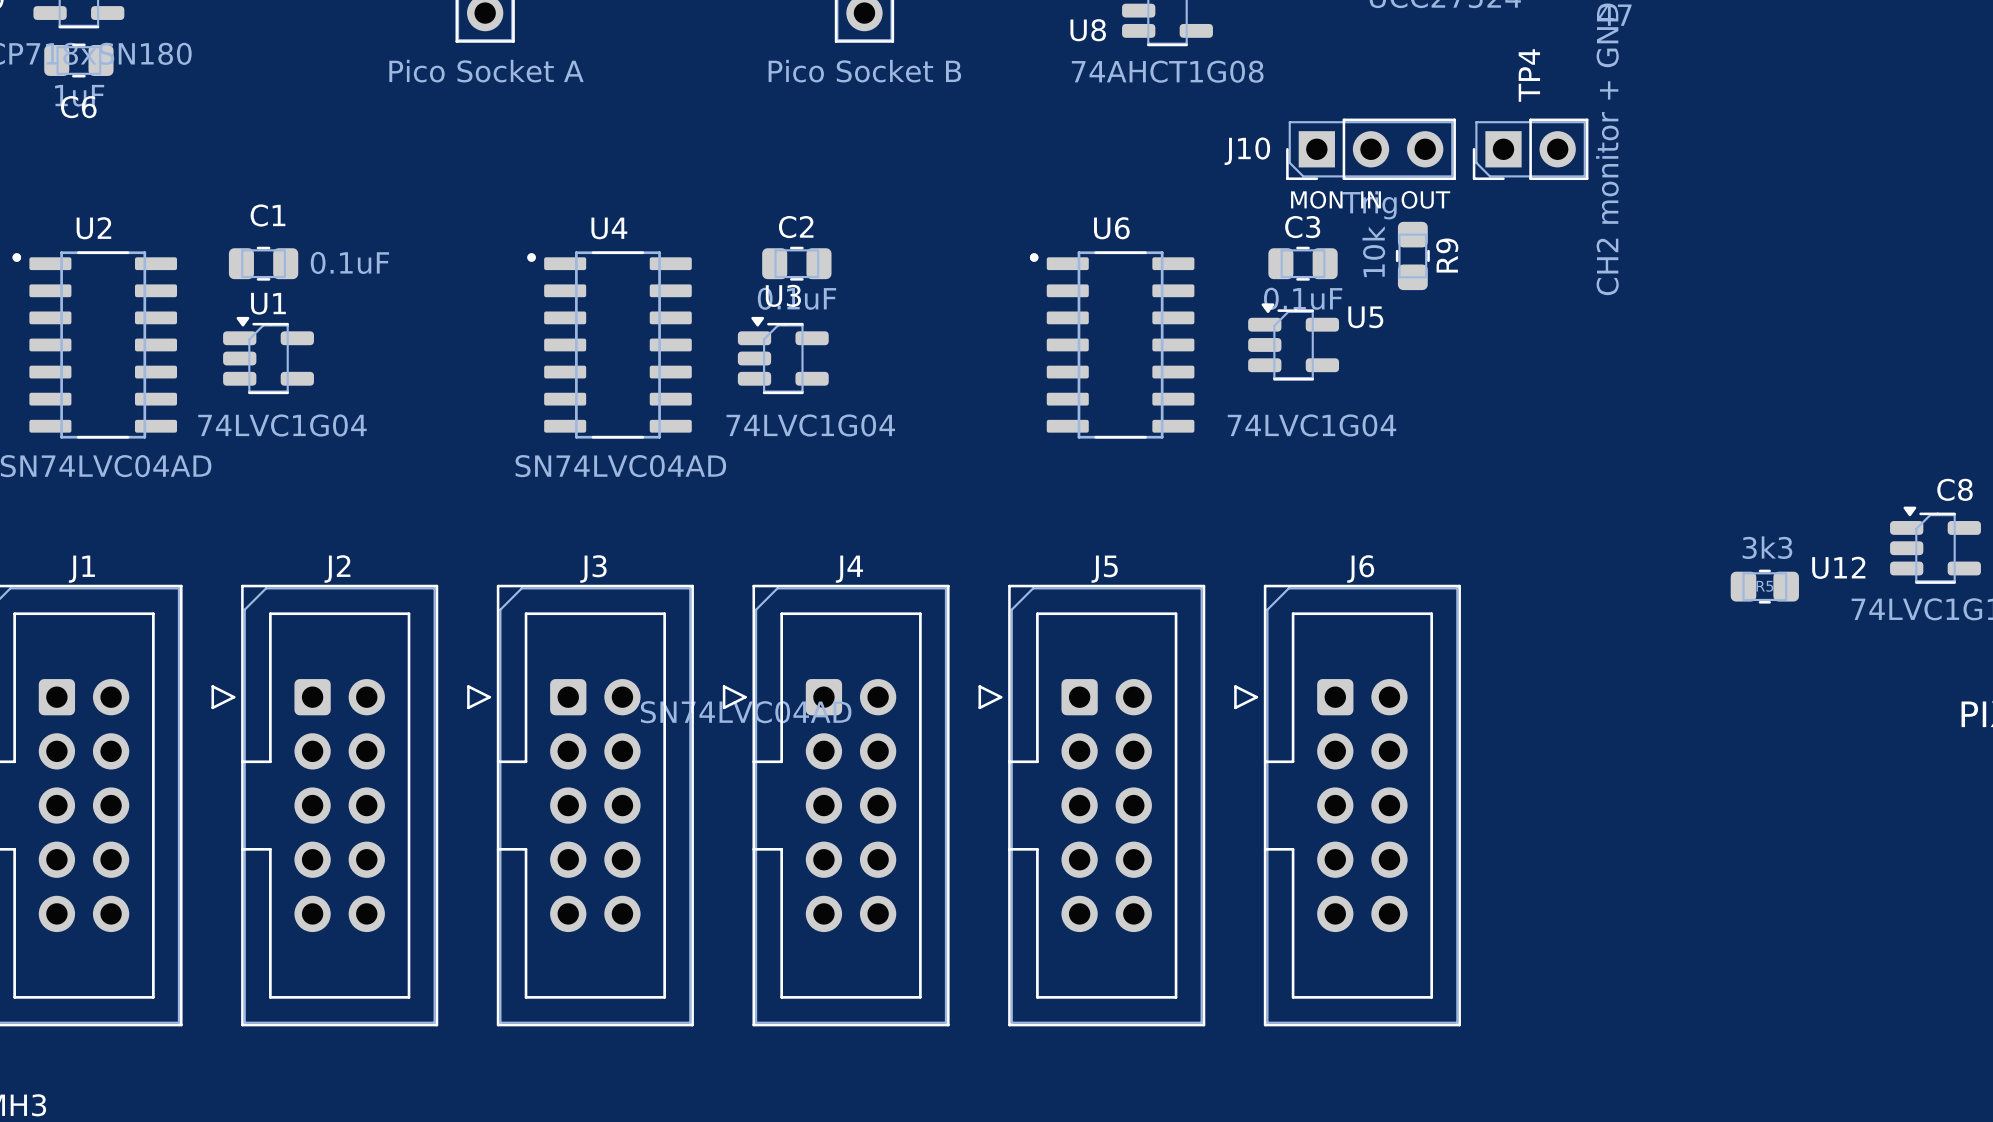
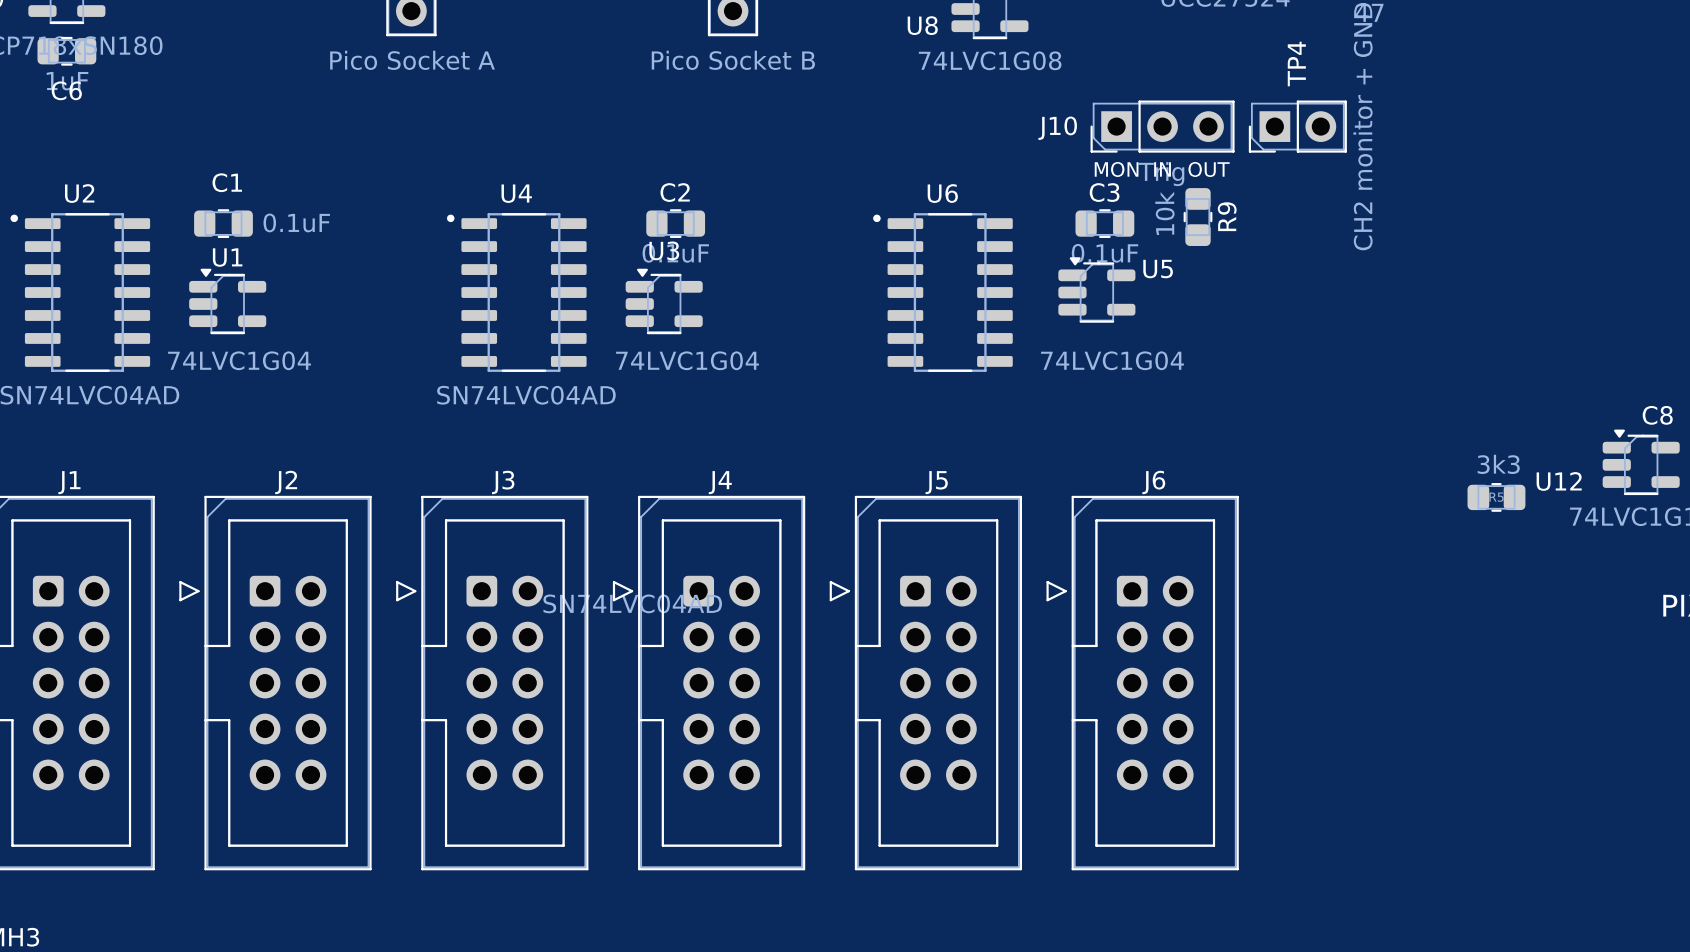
U8 value: 74AHCT1G08 (1167, 71) -> 74LVC1G08 (990, 60)

